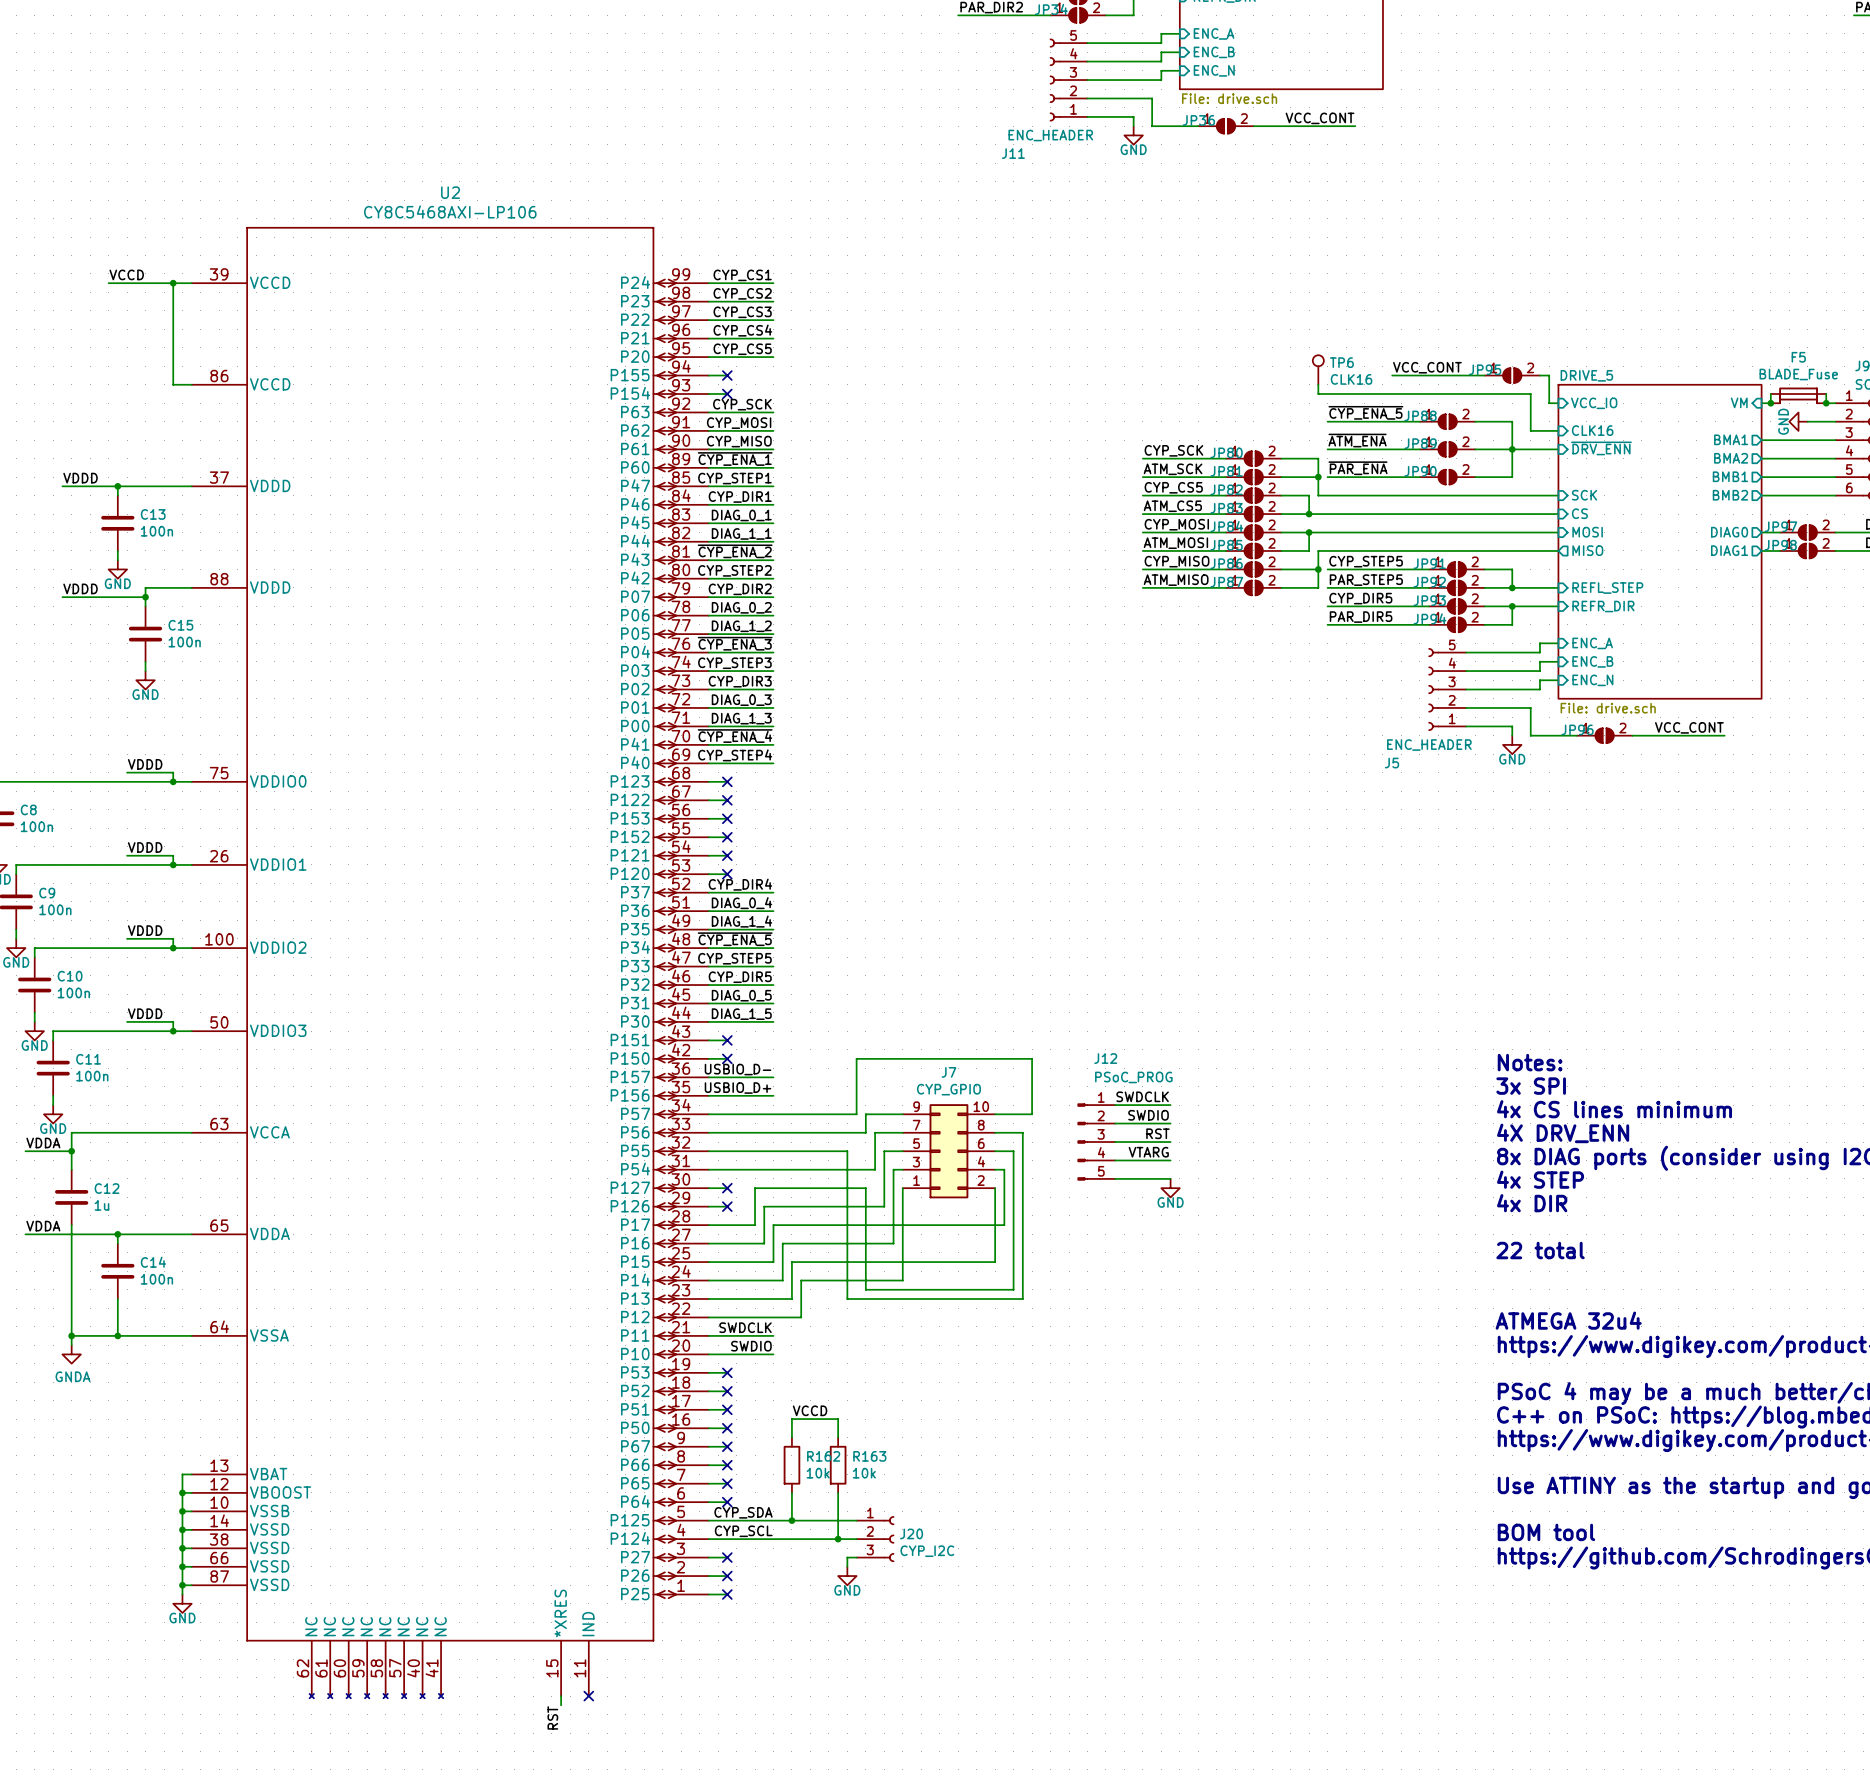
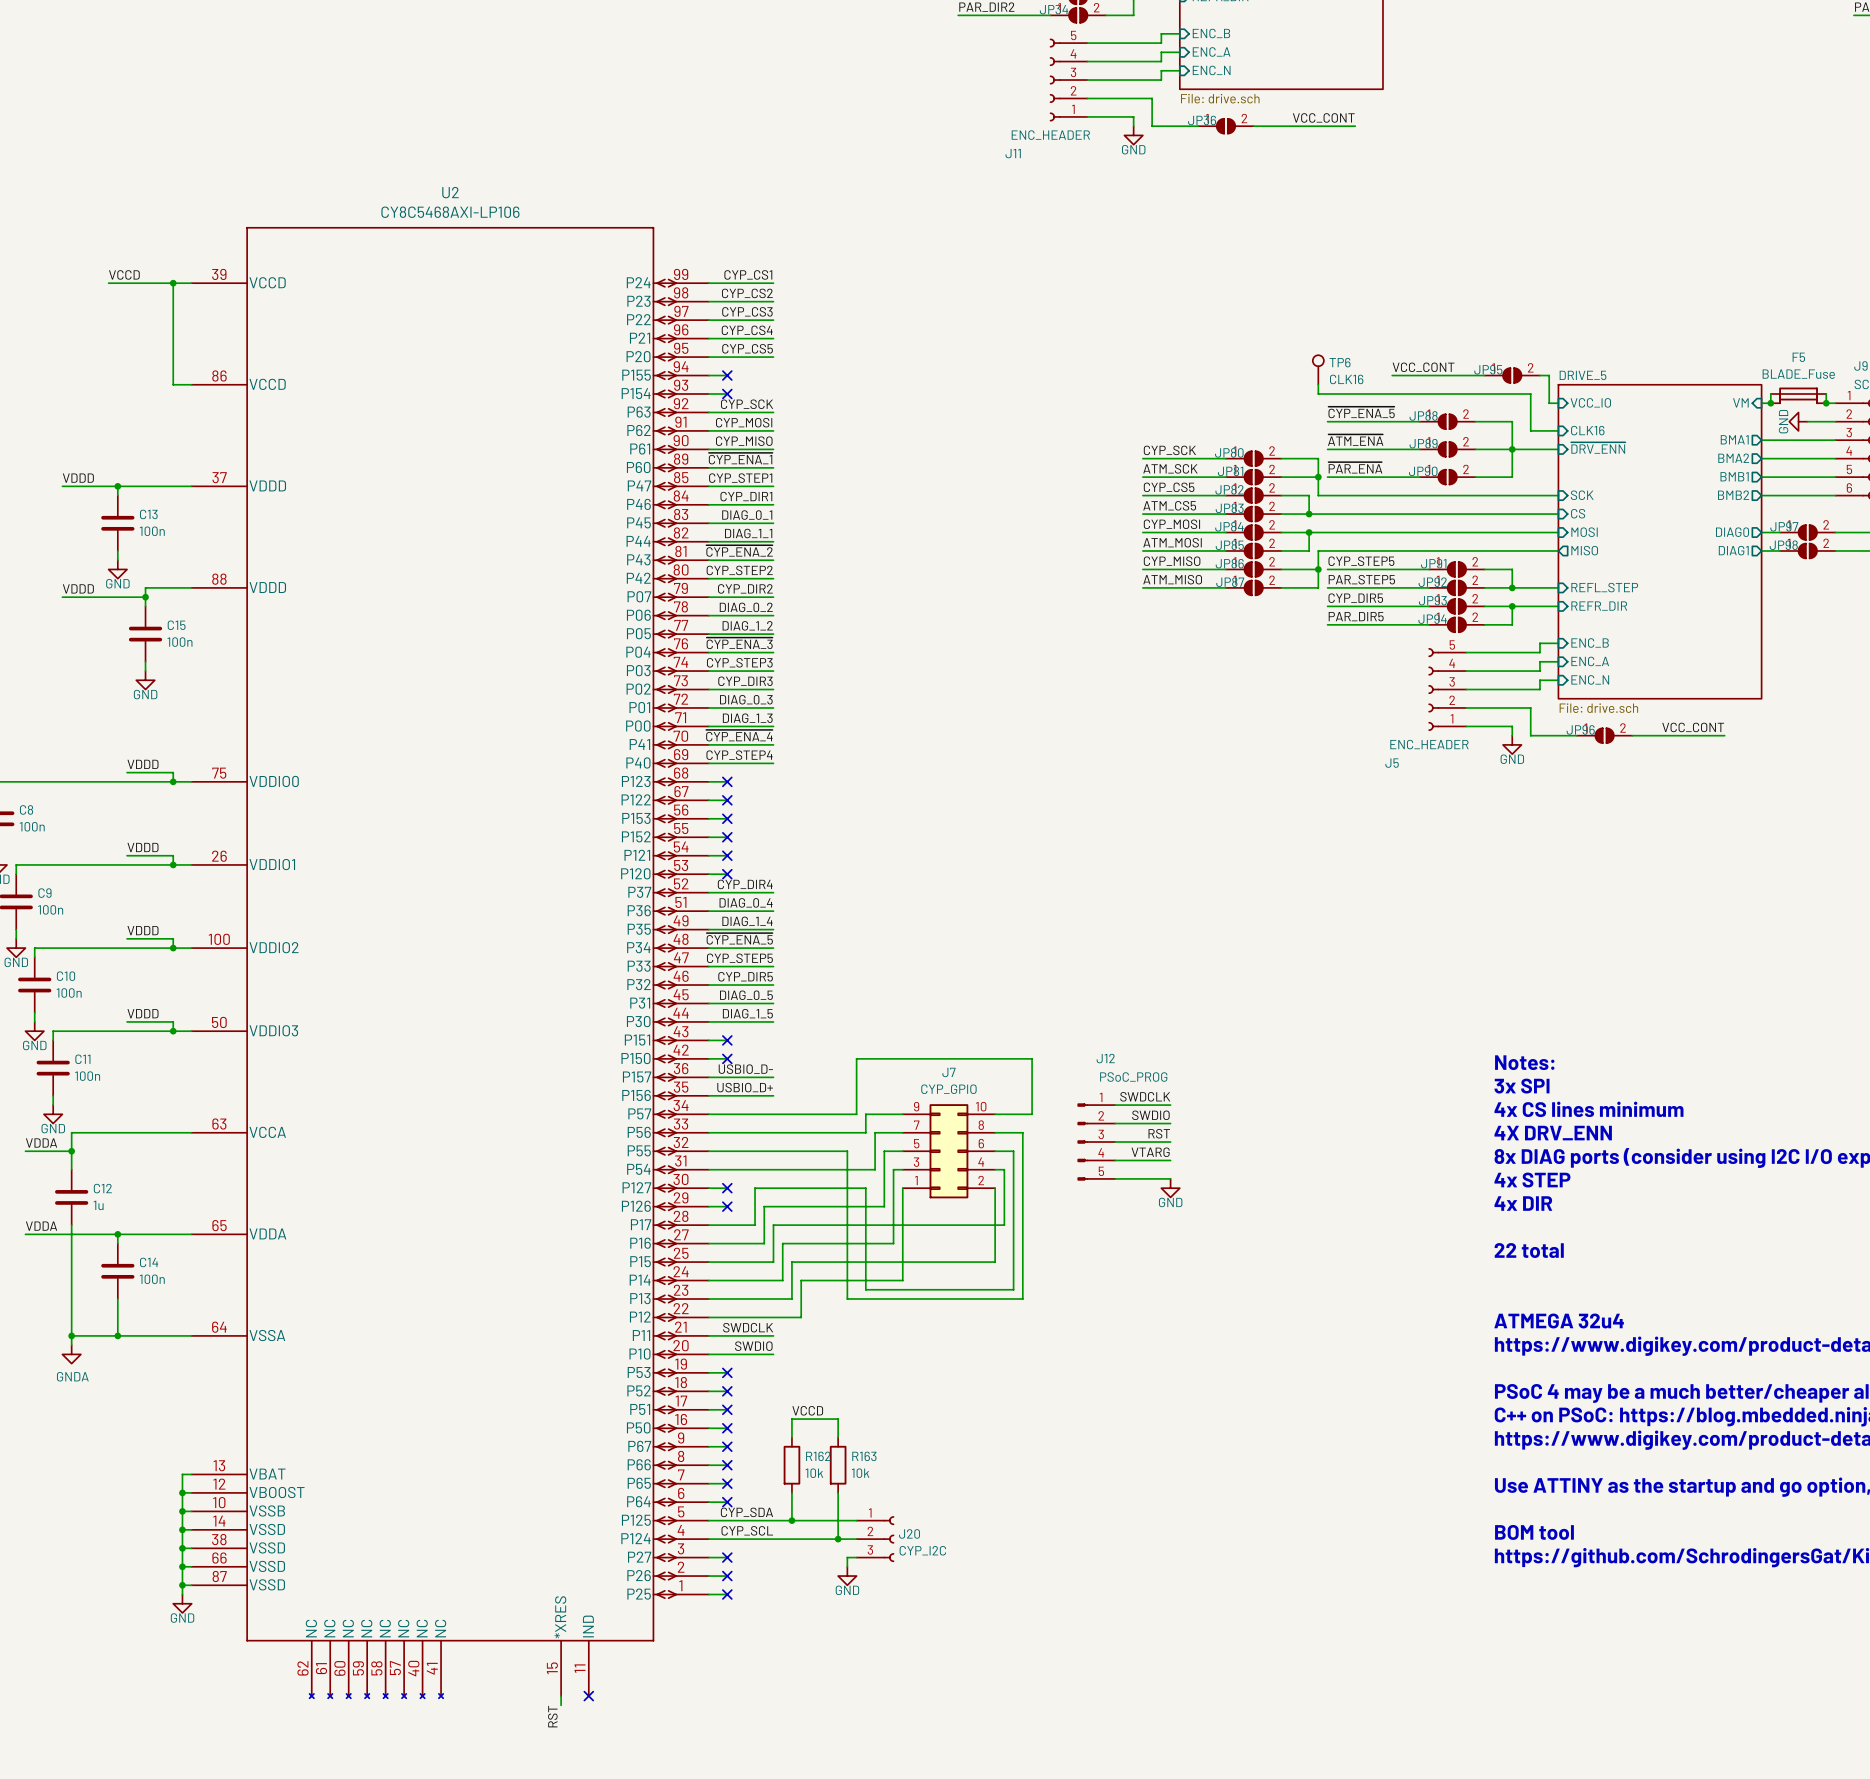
sheet pin: ENC_A (1214, 33) -> ENC_B (1211, 33)
sheet pin: ENC_B (1214, 52) -> ENC_A (1211, 51)
sheet pin: ENC_A (1592, 643) -> ENC_B (1590, 642)
sheet pin: ENC_B (1592, 661) -> ENC_A (1590, 661)

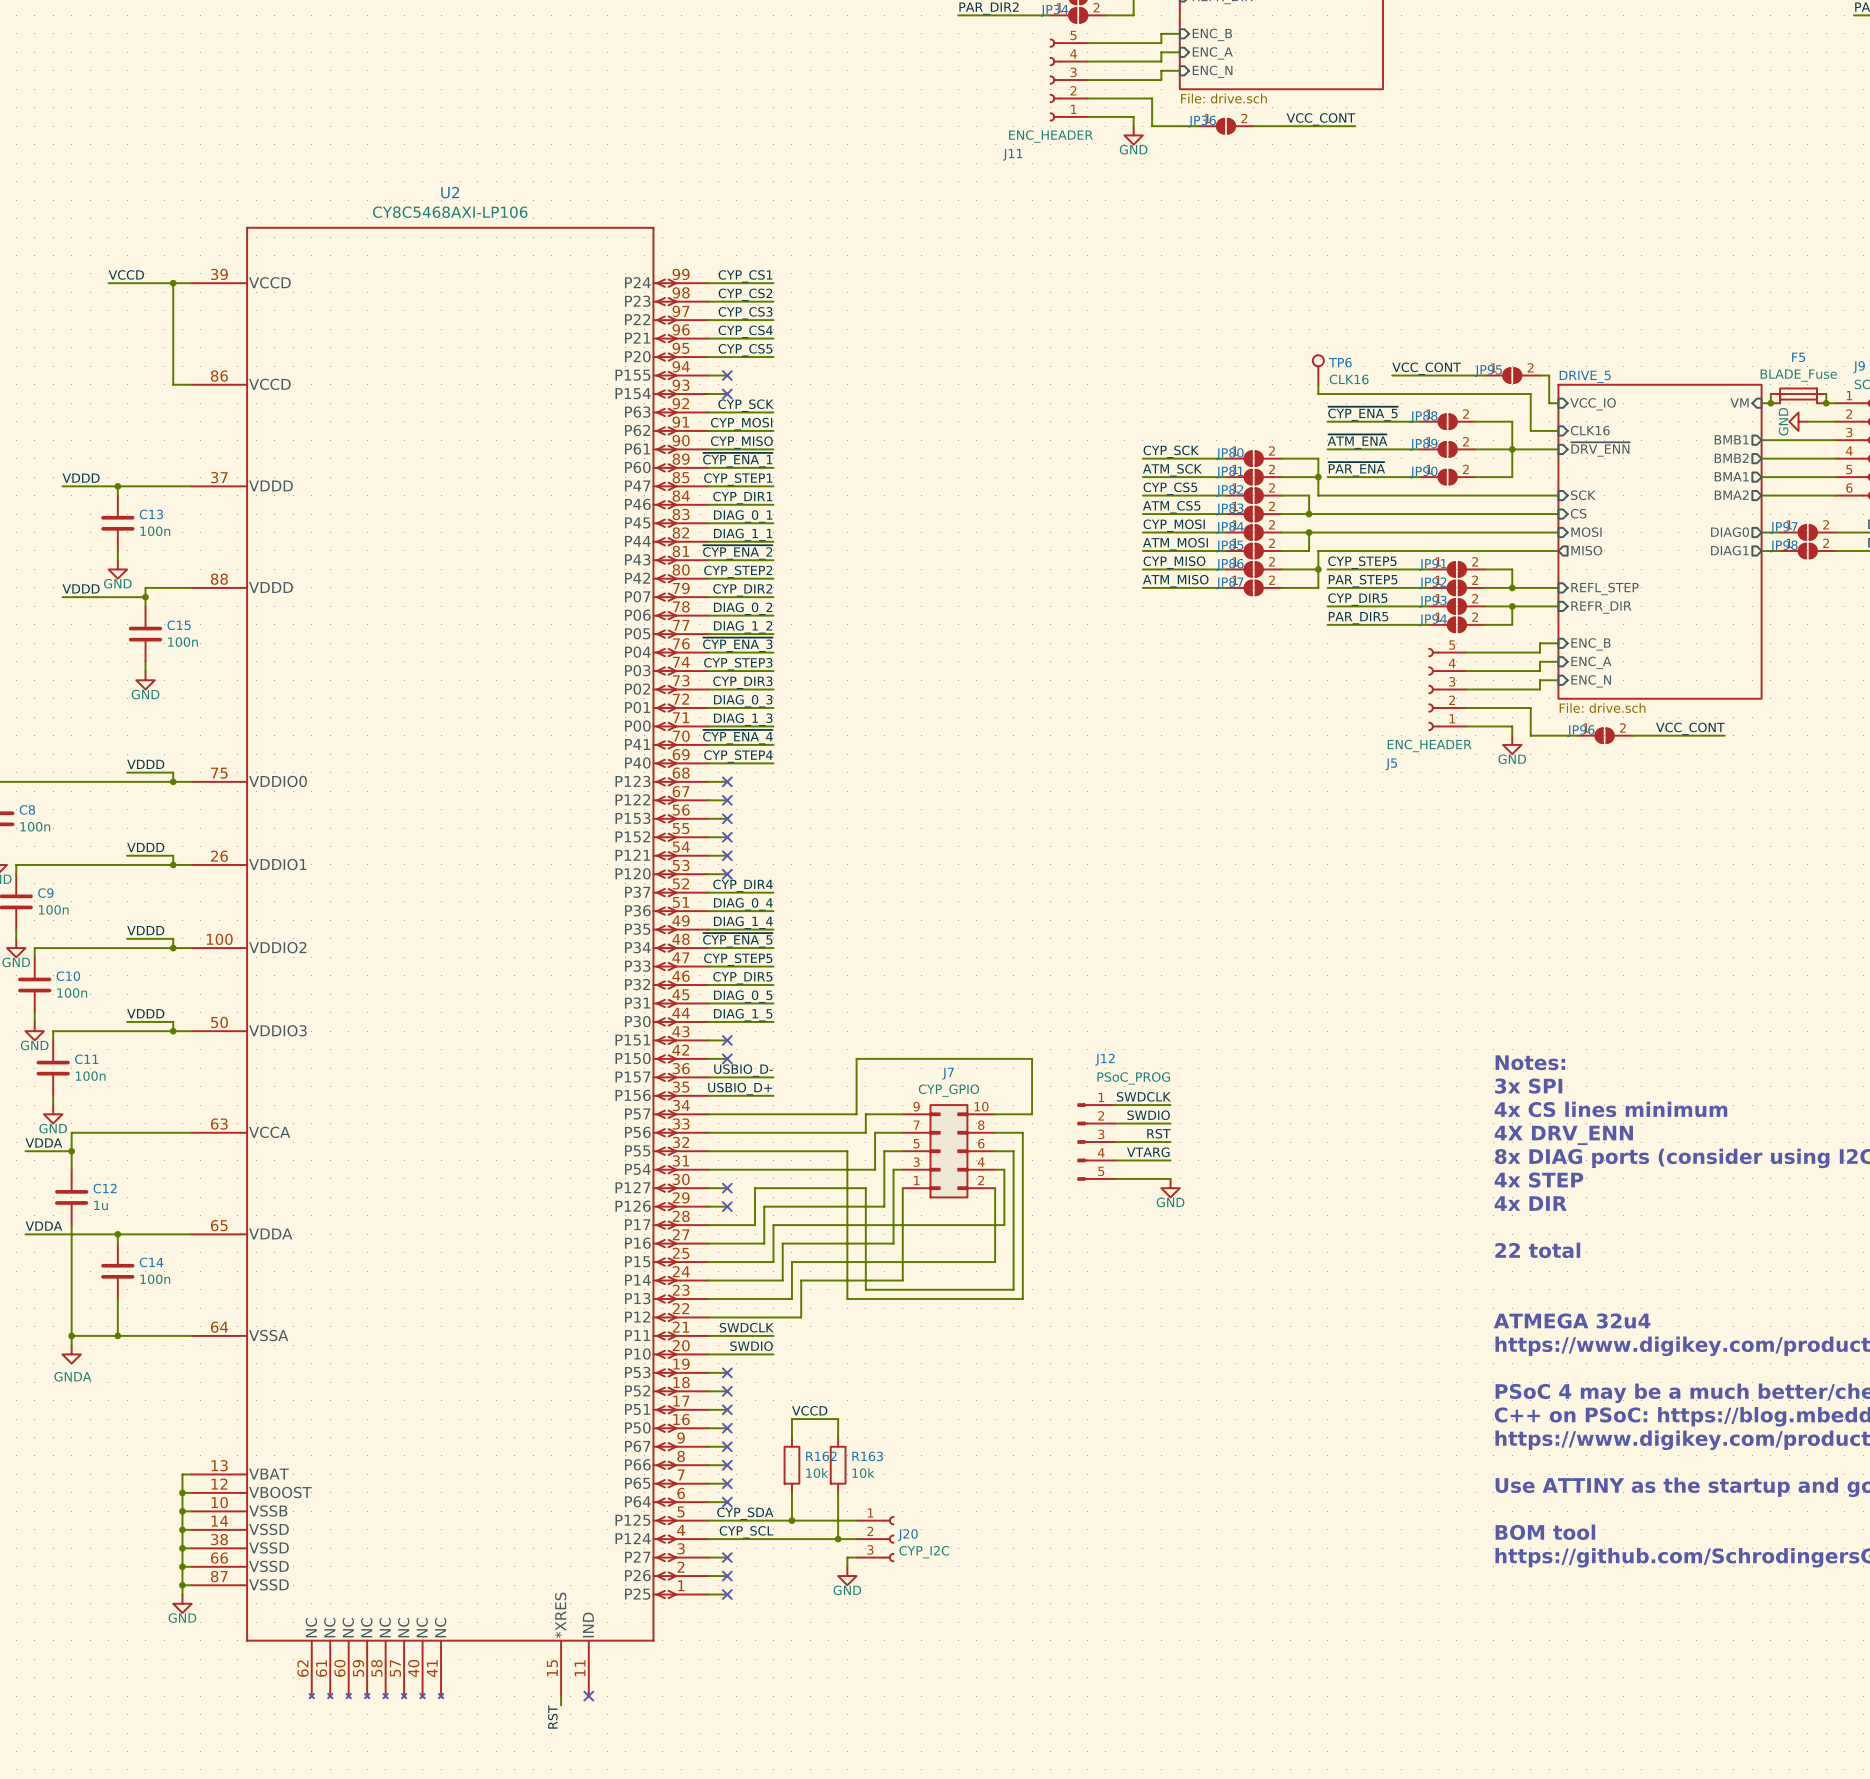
sheet pin: BMA1 (1734, 439) -> BMB1 (1731, 439)
sheet pin: BMA2 (1733, 458) -> BMB2 (1731, 458)
sheet pin: BMB1 (1734, 476) -> BMA1 (1731, 476)
sheet pin: BMB2 (1733, 495) -> BMA2 (1731, 495)

